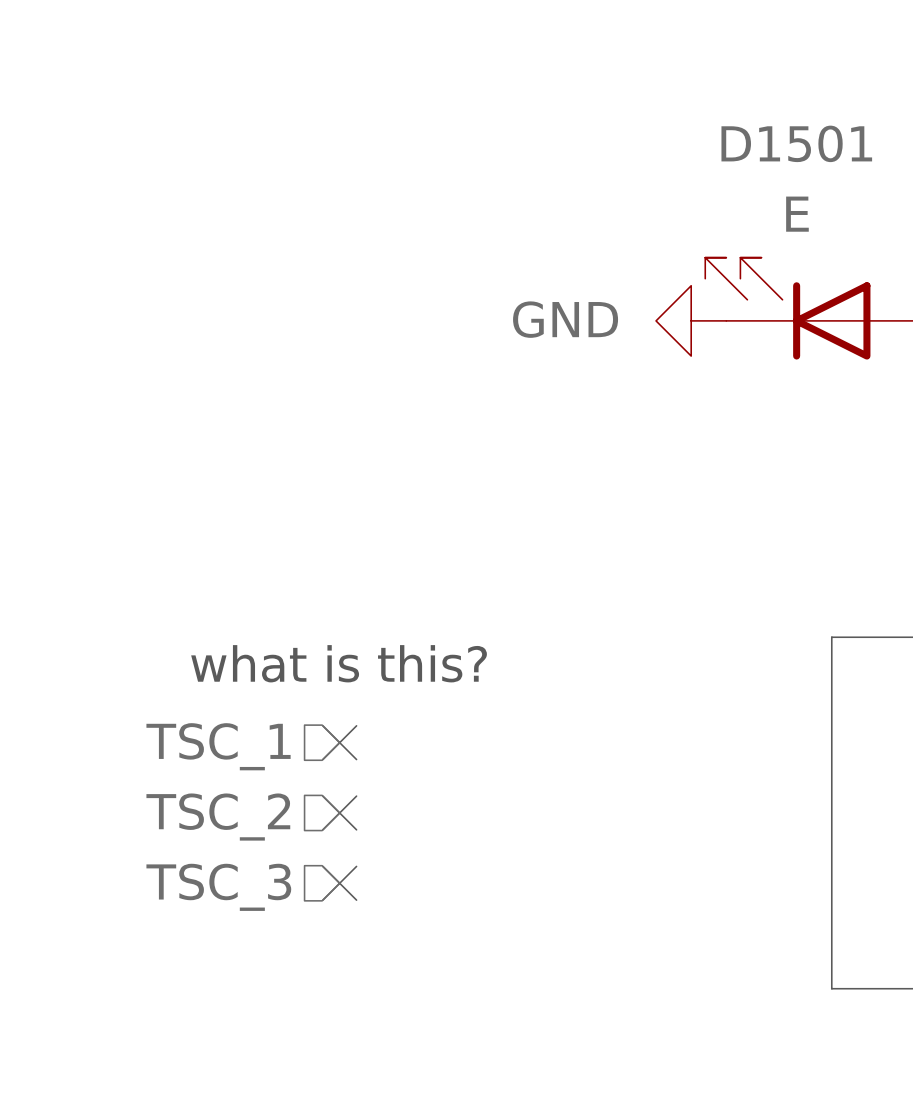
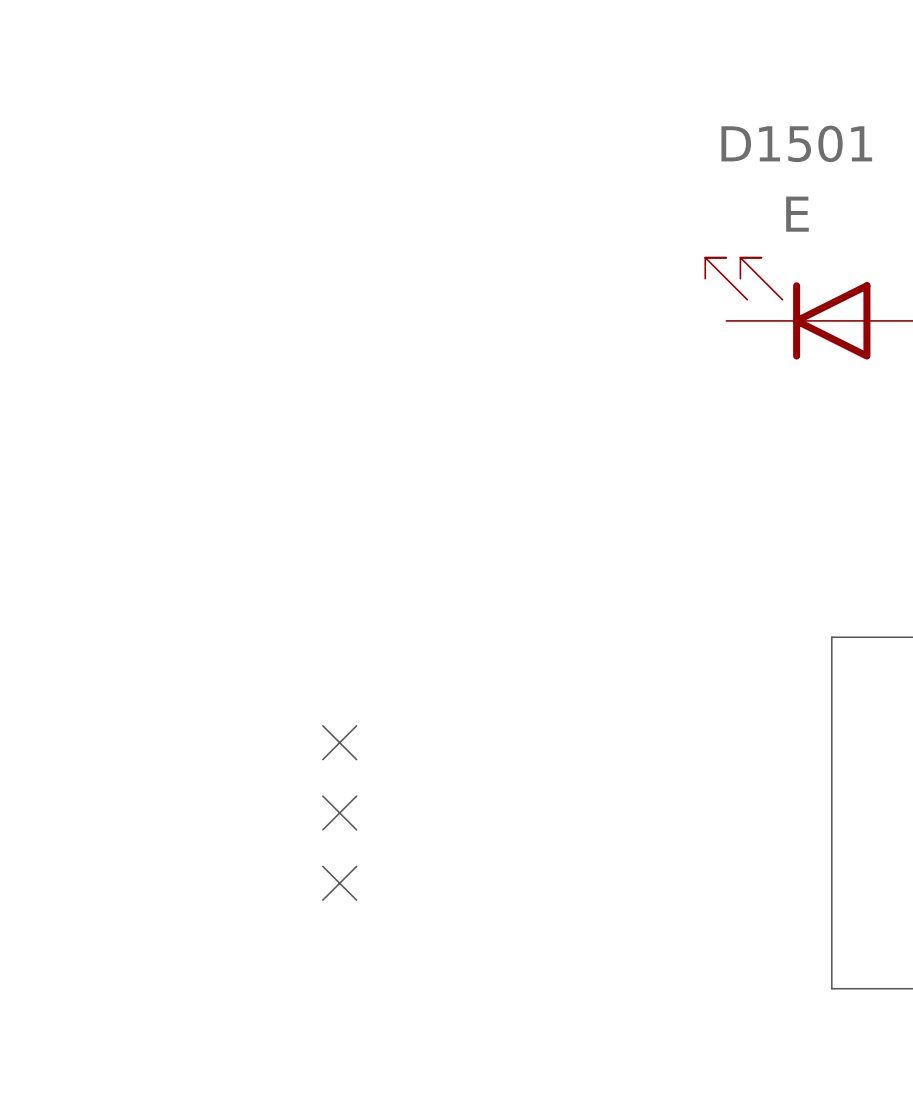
power symbol: GND (691, 320) -> none
text: what is this? (339, 663) -> none
hierarchical label: TSC_1 (218, 746) -> none
hierarchical label: TSC_2 (218, 817) -> none
hierarchical label: TSC_3 (218, 887) -> none

